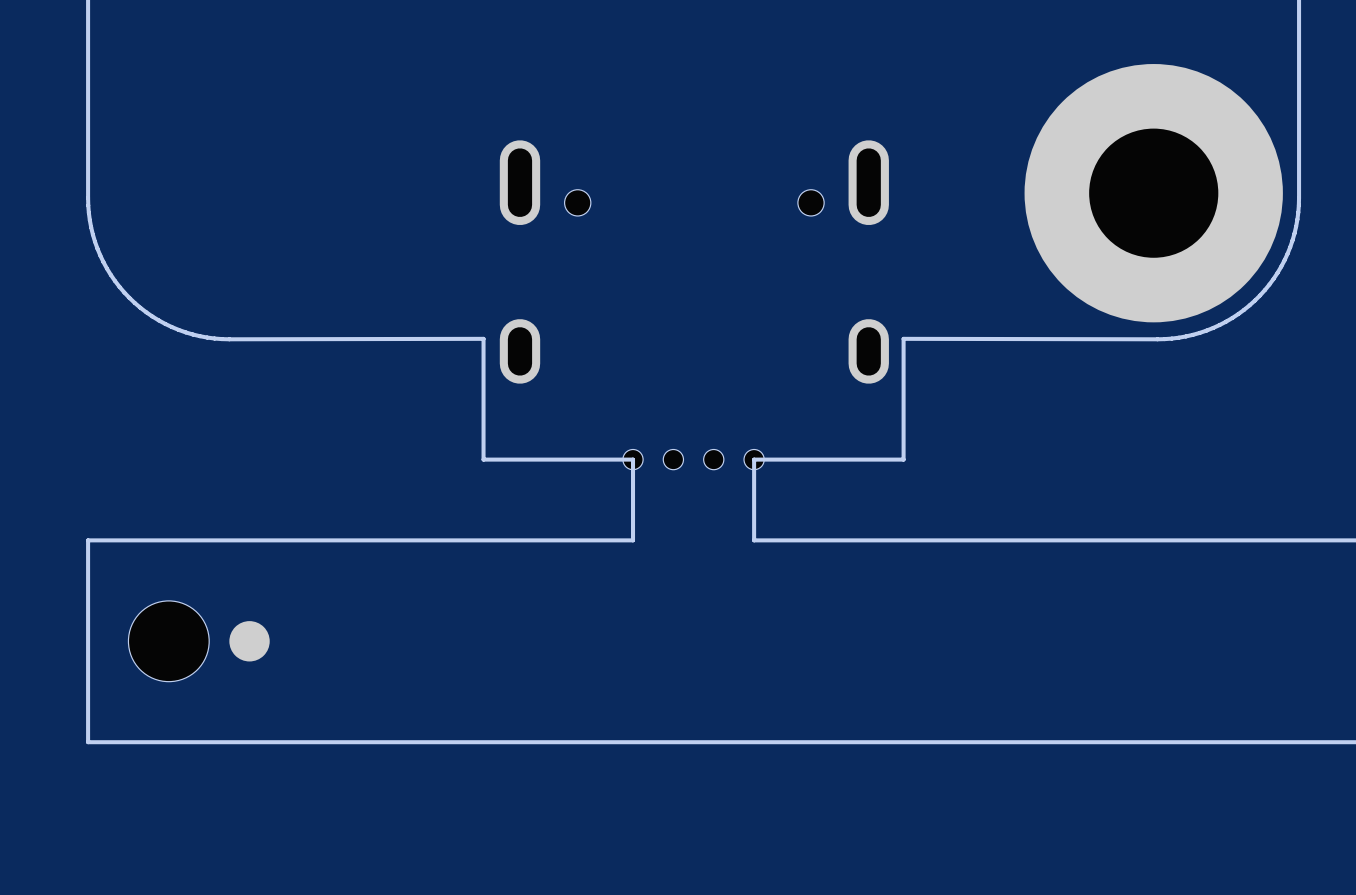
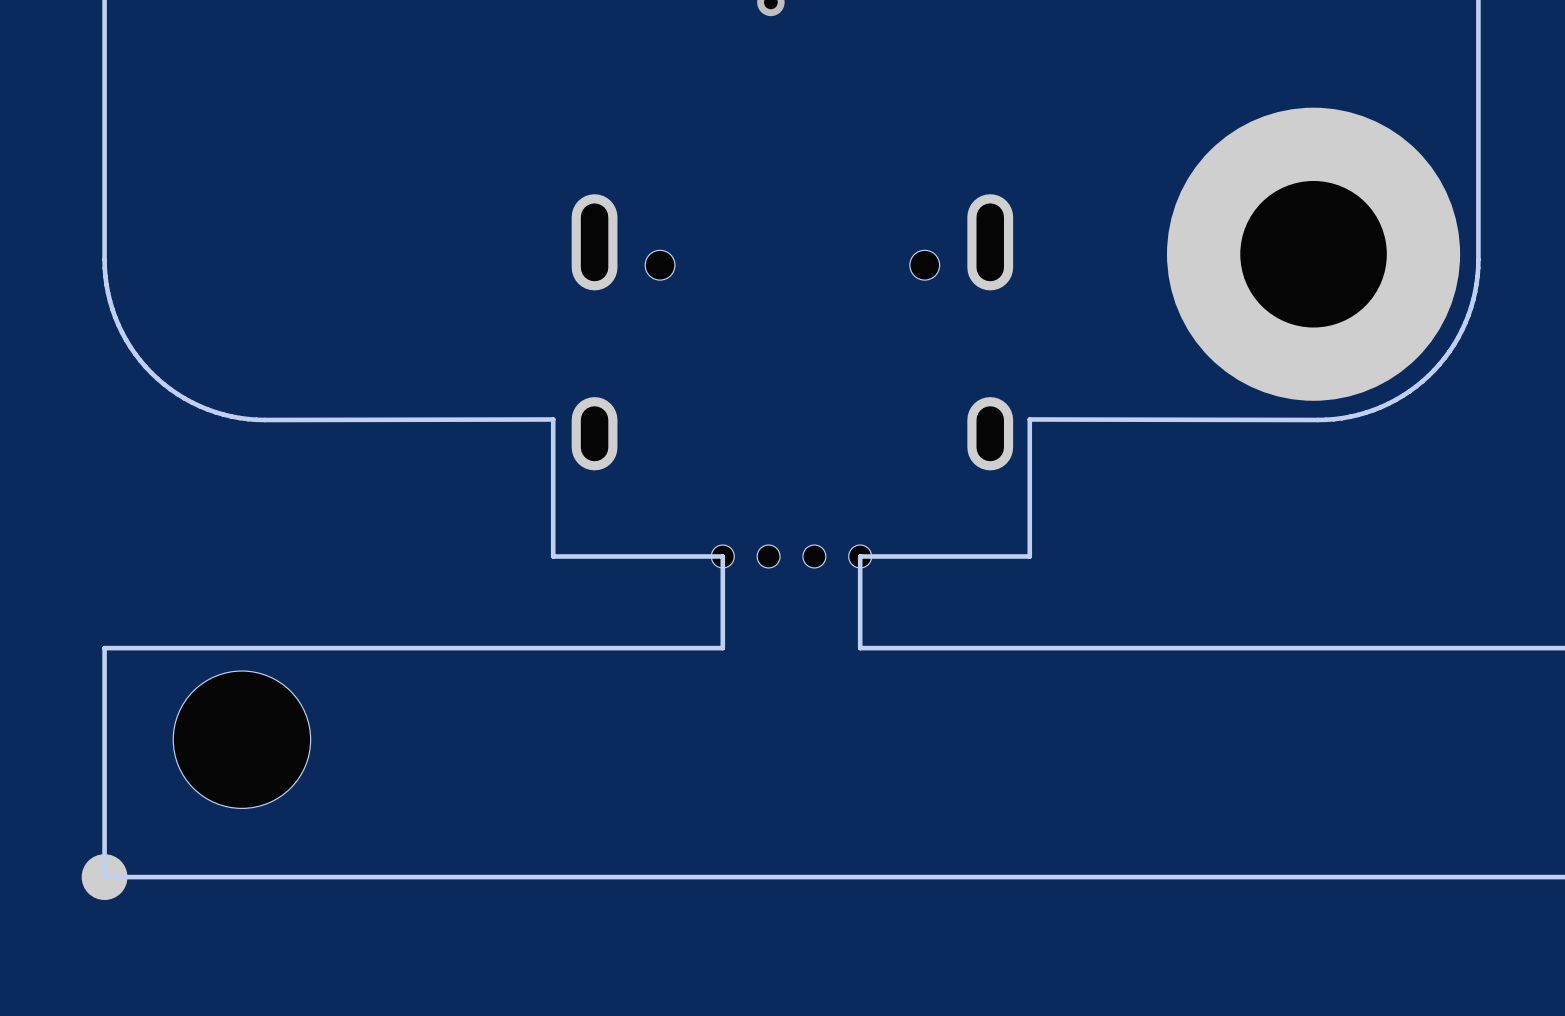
part: none -> (241, 739)
part: (168, 641) -> none
part position: (249, 641) -> (104, 877)

